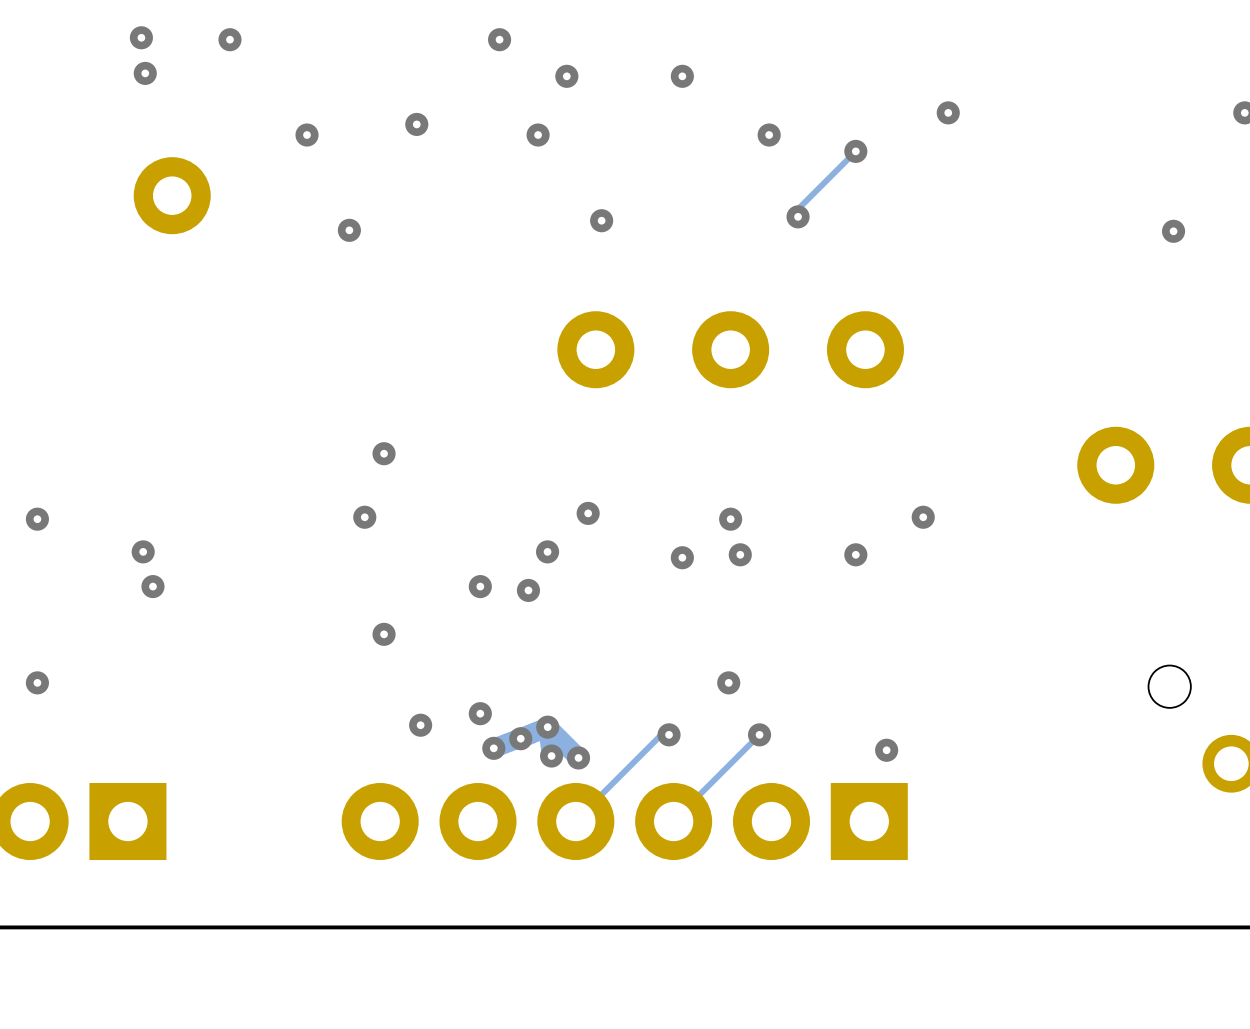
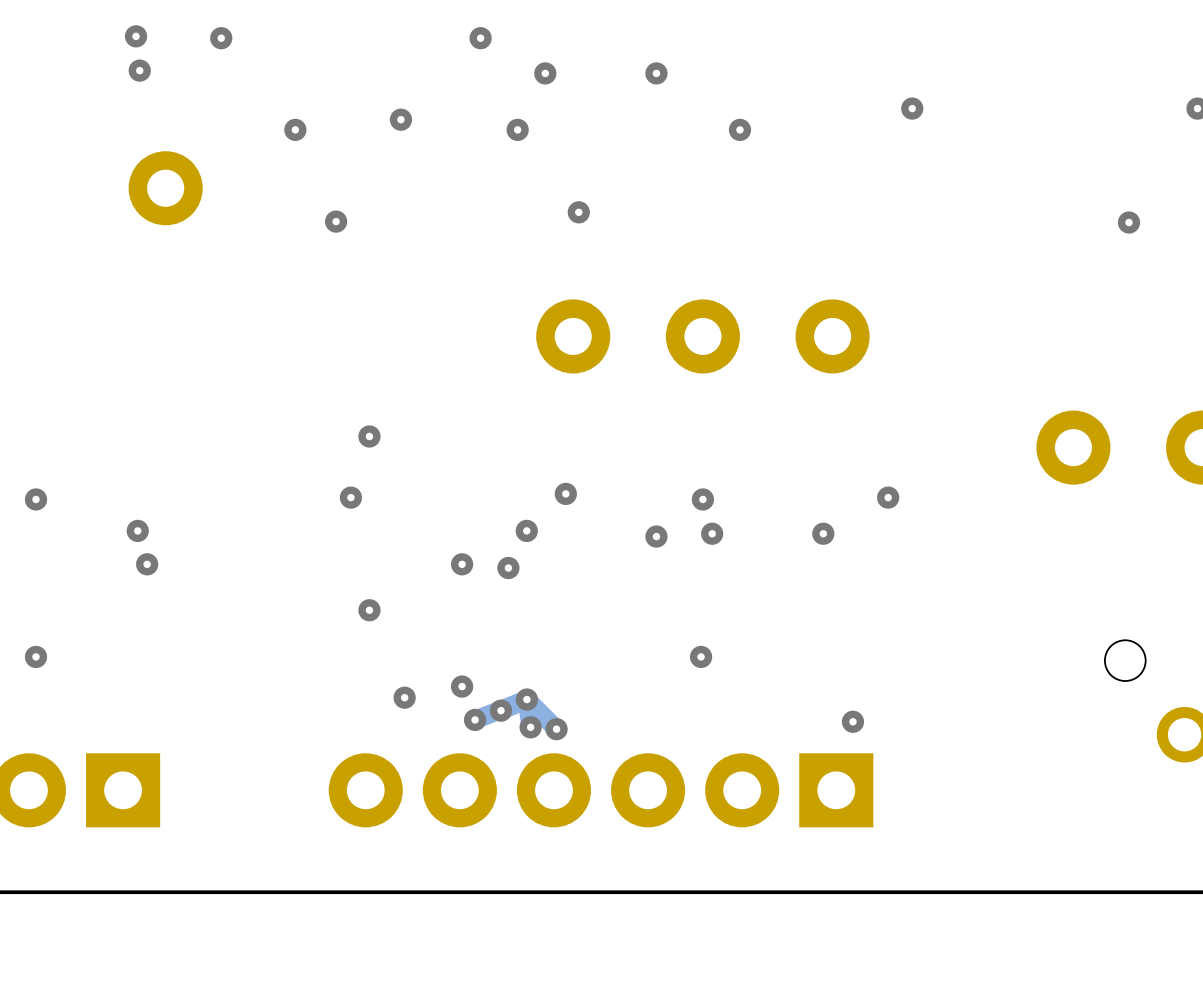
track: (855, 151) (798, 209) (798, 216) -> none
via: (855, 151) -> none
via: (798, 216) -> none
track: (669, 734) (661, 734) (576, 819) -> none
via: (669, 734) -> none
track: (759, 734) (674, 819) -> none
via: (759, 734) -> none

